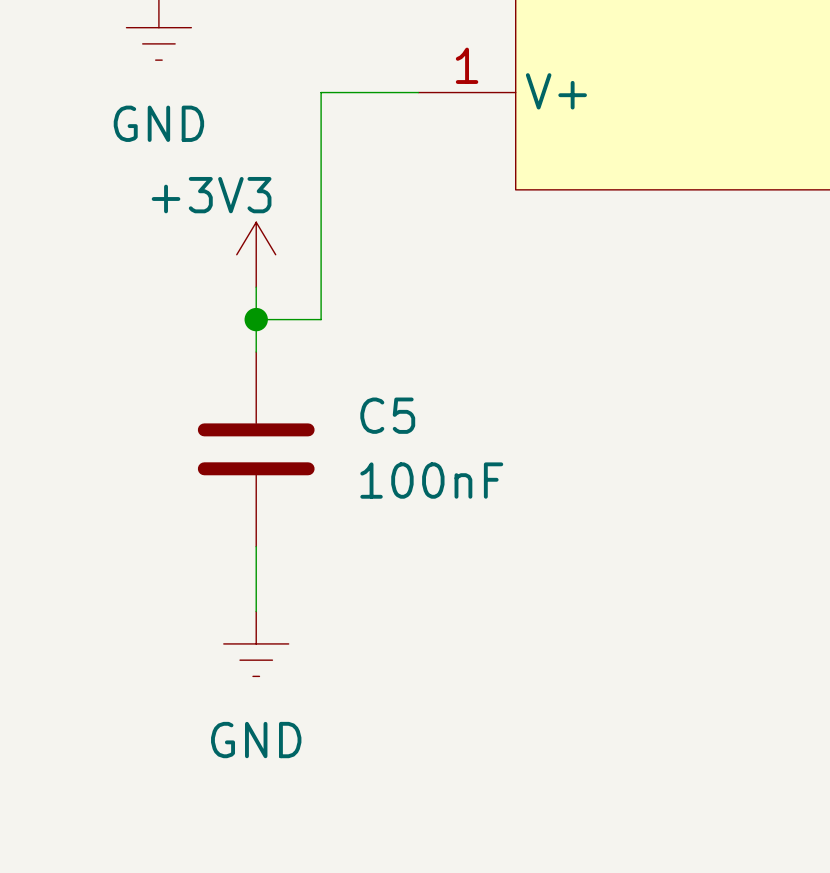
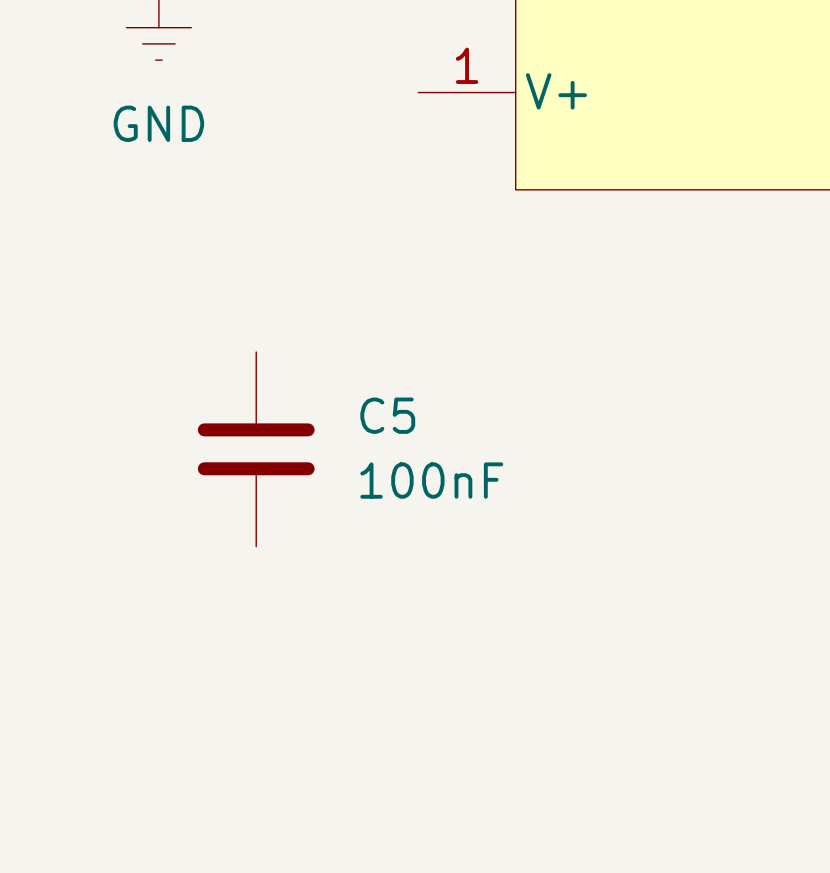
wire: (418, 92) (321, 92) (321, 319) (256, 319) -> none
power symbol: +3V3 (256, 254) -> none
wire: (256, 287) (256, 352) -> none
junction: (256, 319) -> none
wire: (256, 546) (256, 611) -> none
power symbol: GND (256, 643) -> none

